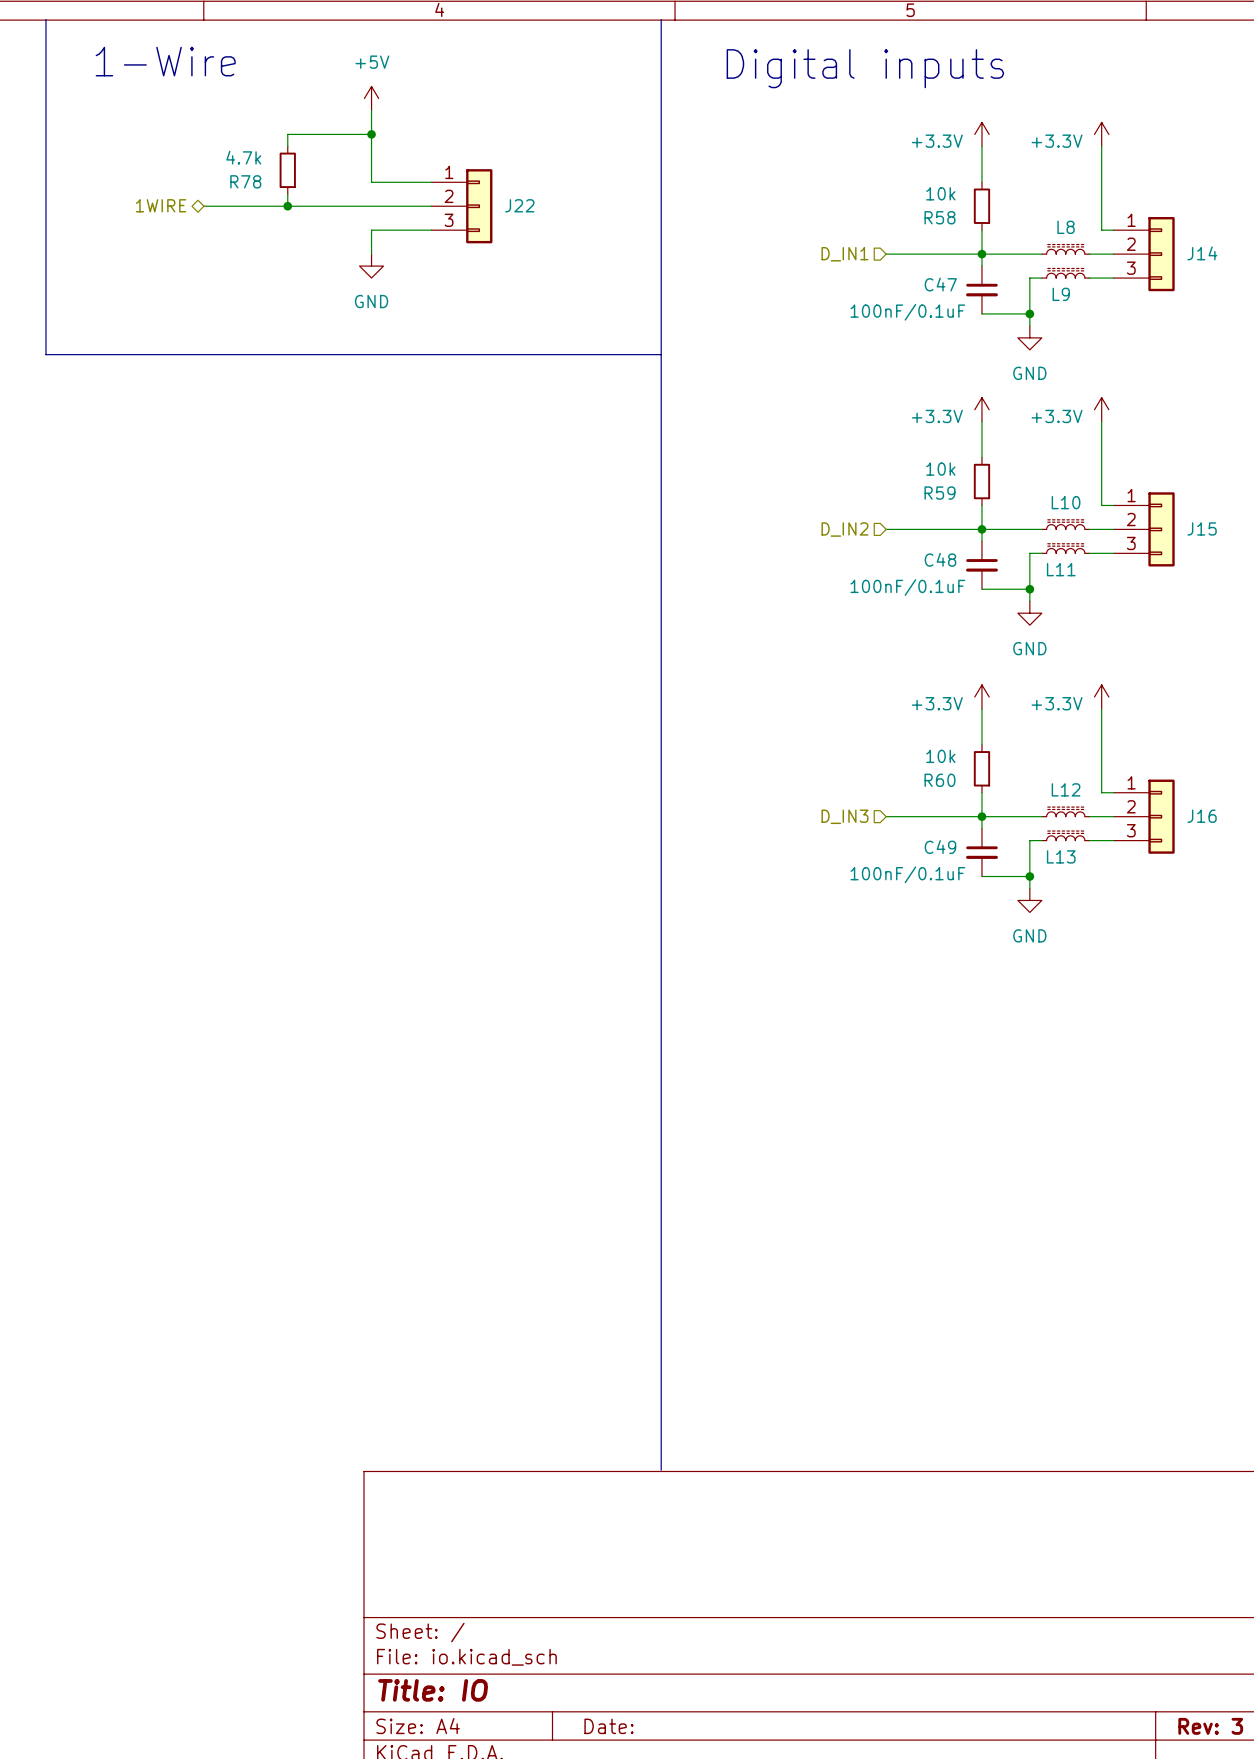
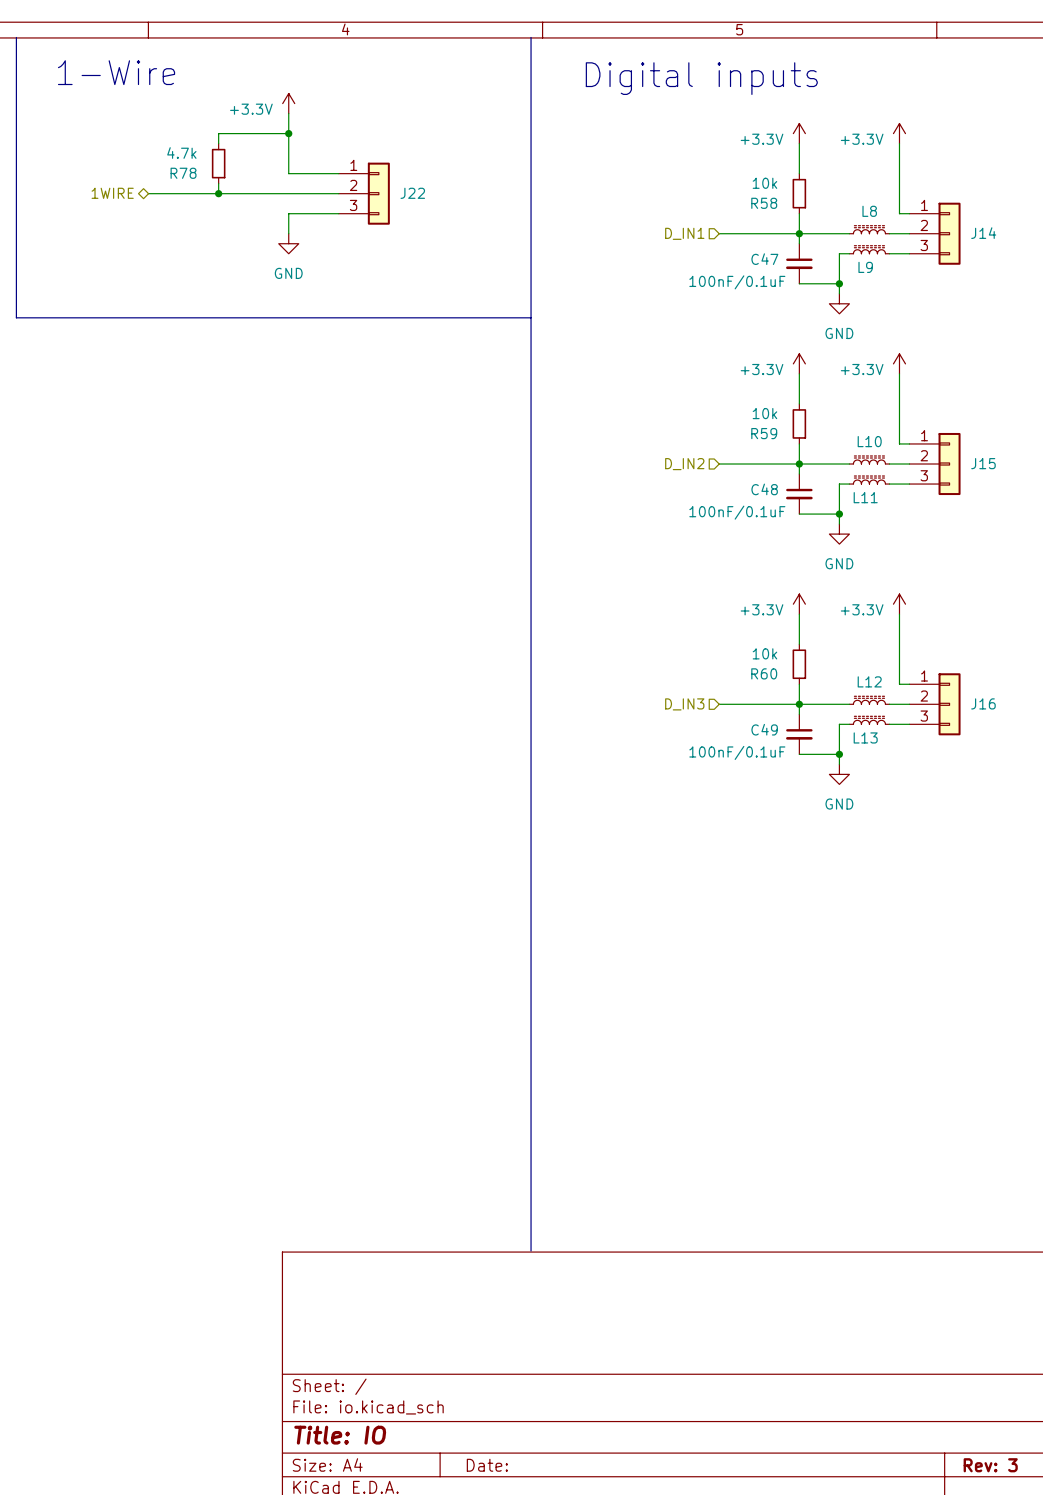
power symbol: +5V (371, 98) -> +3.3V (288, 103)

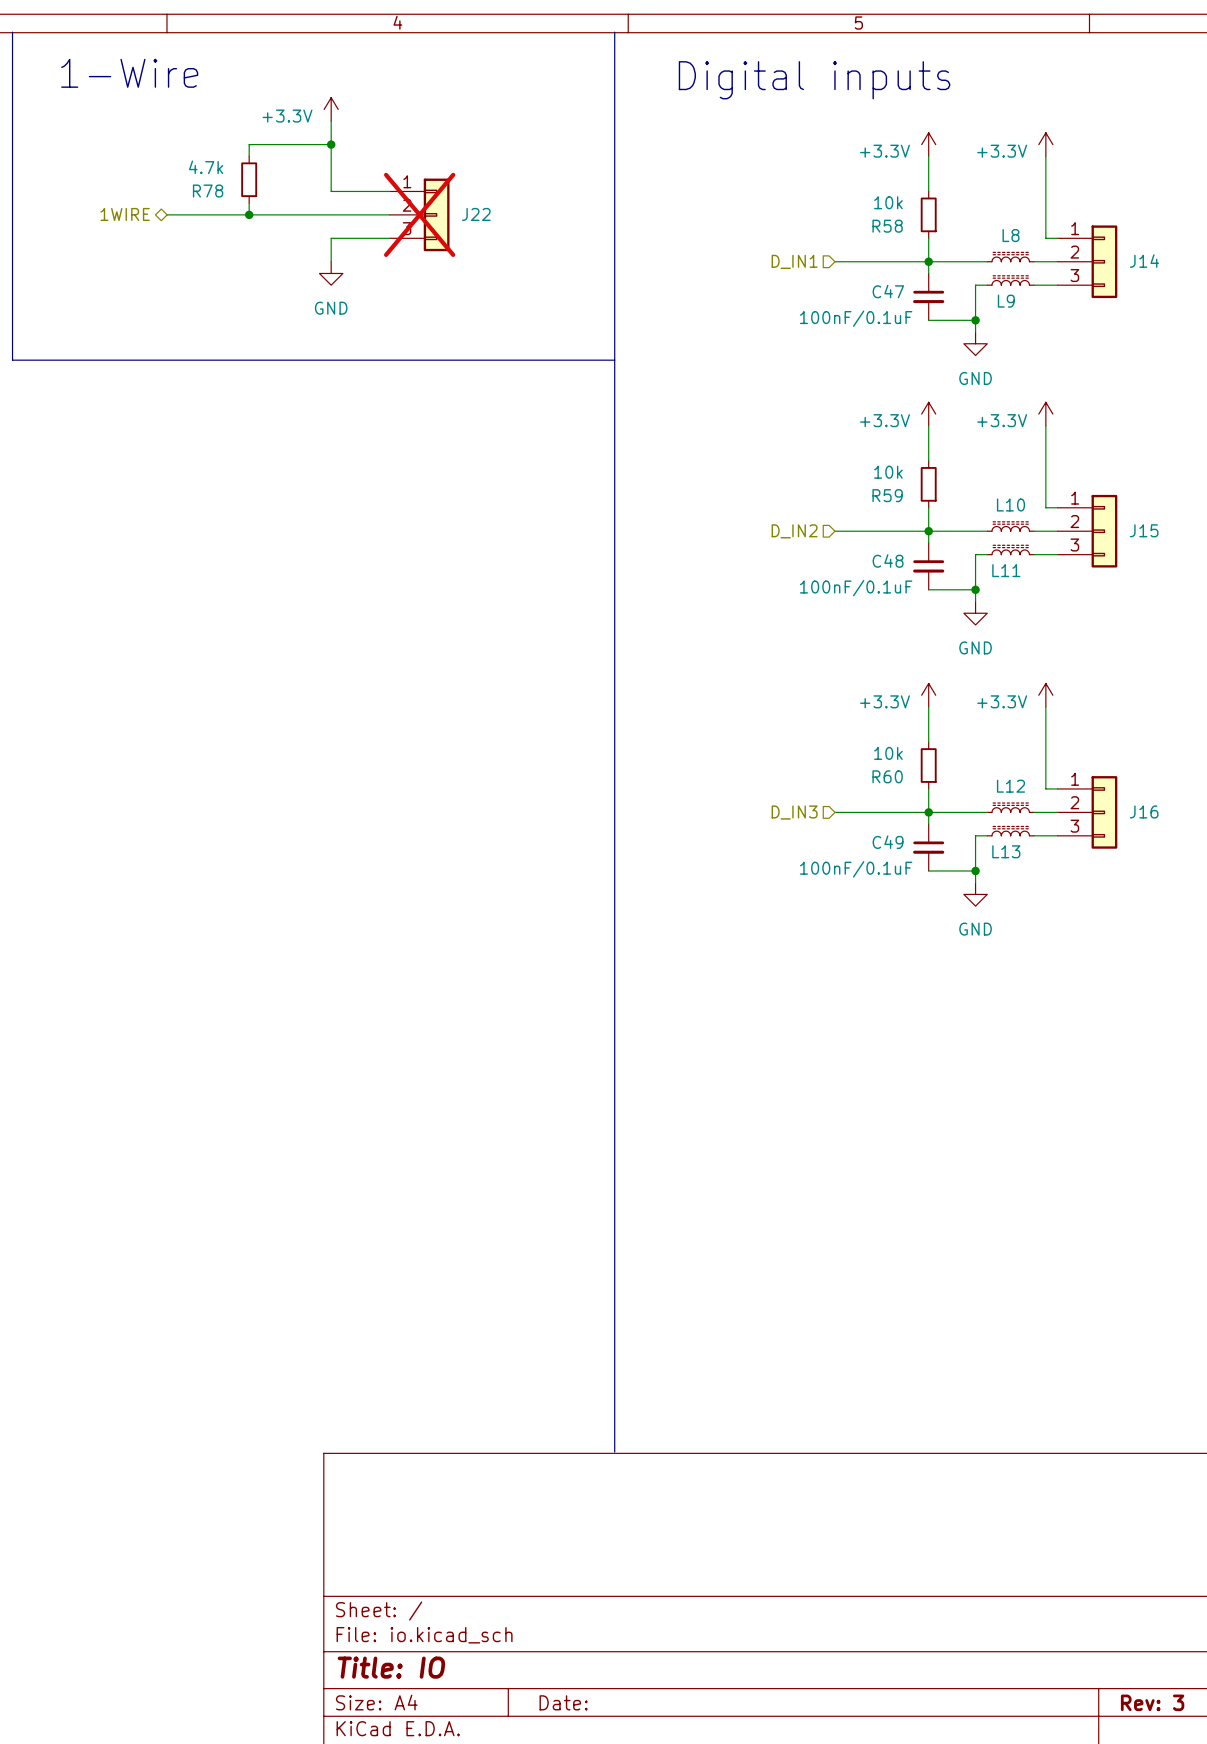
J22 do-not-place cross: none -> (419, 214)

